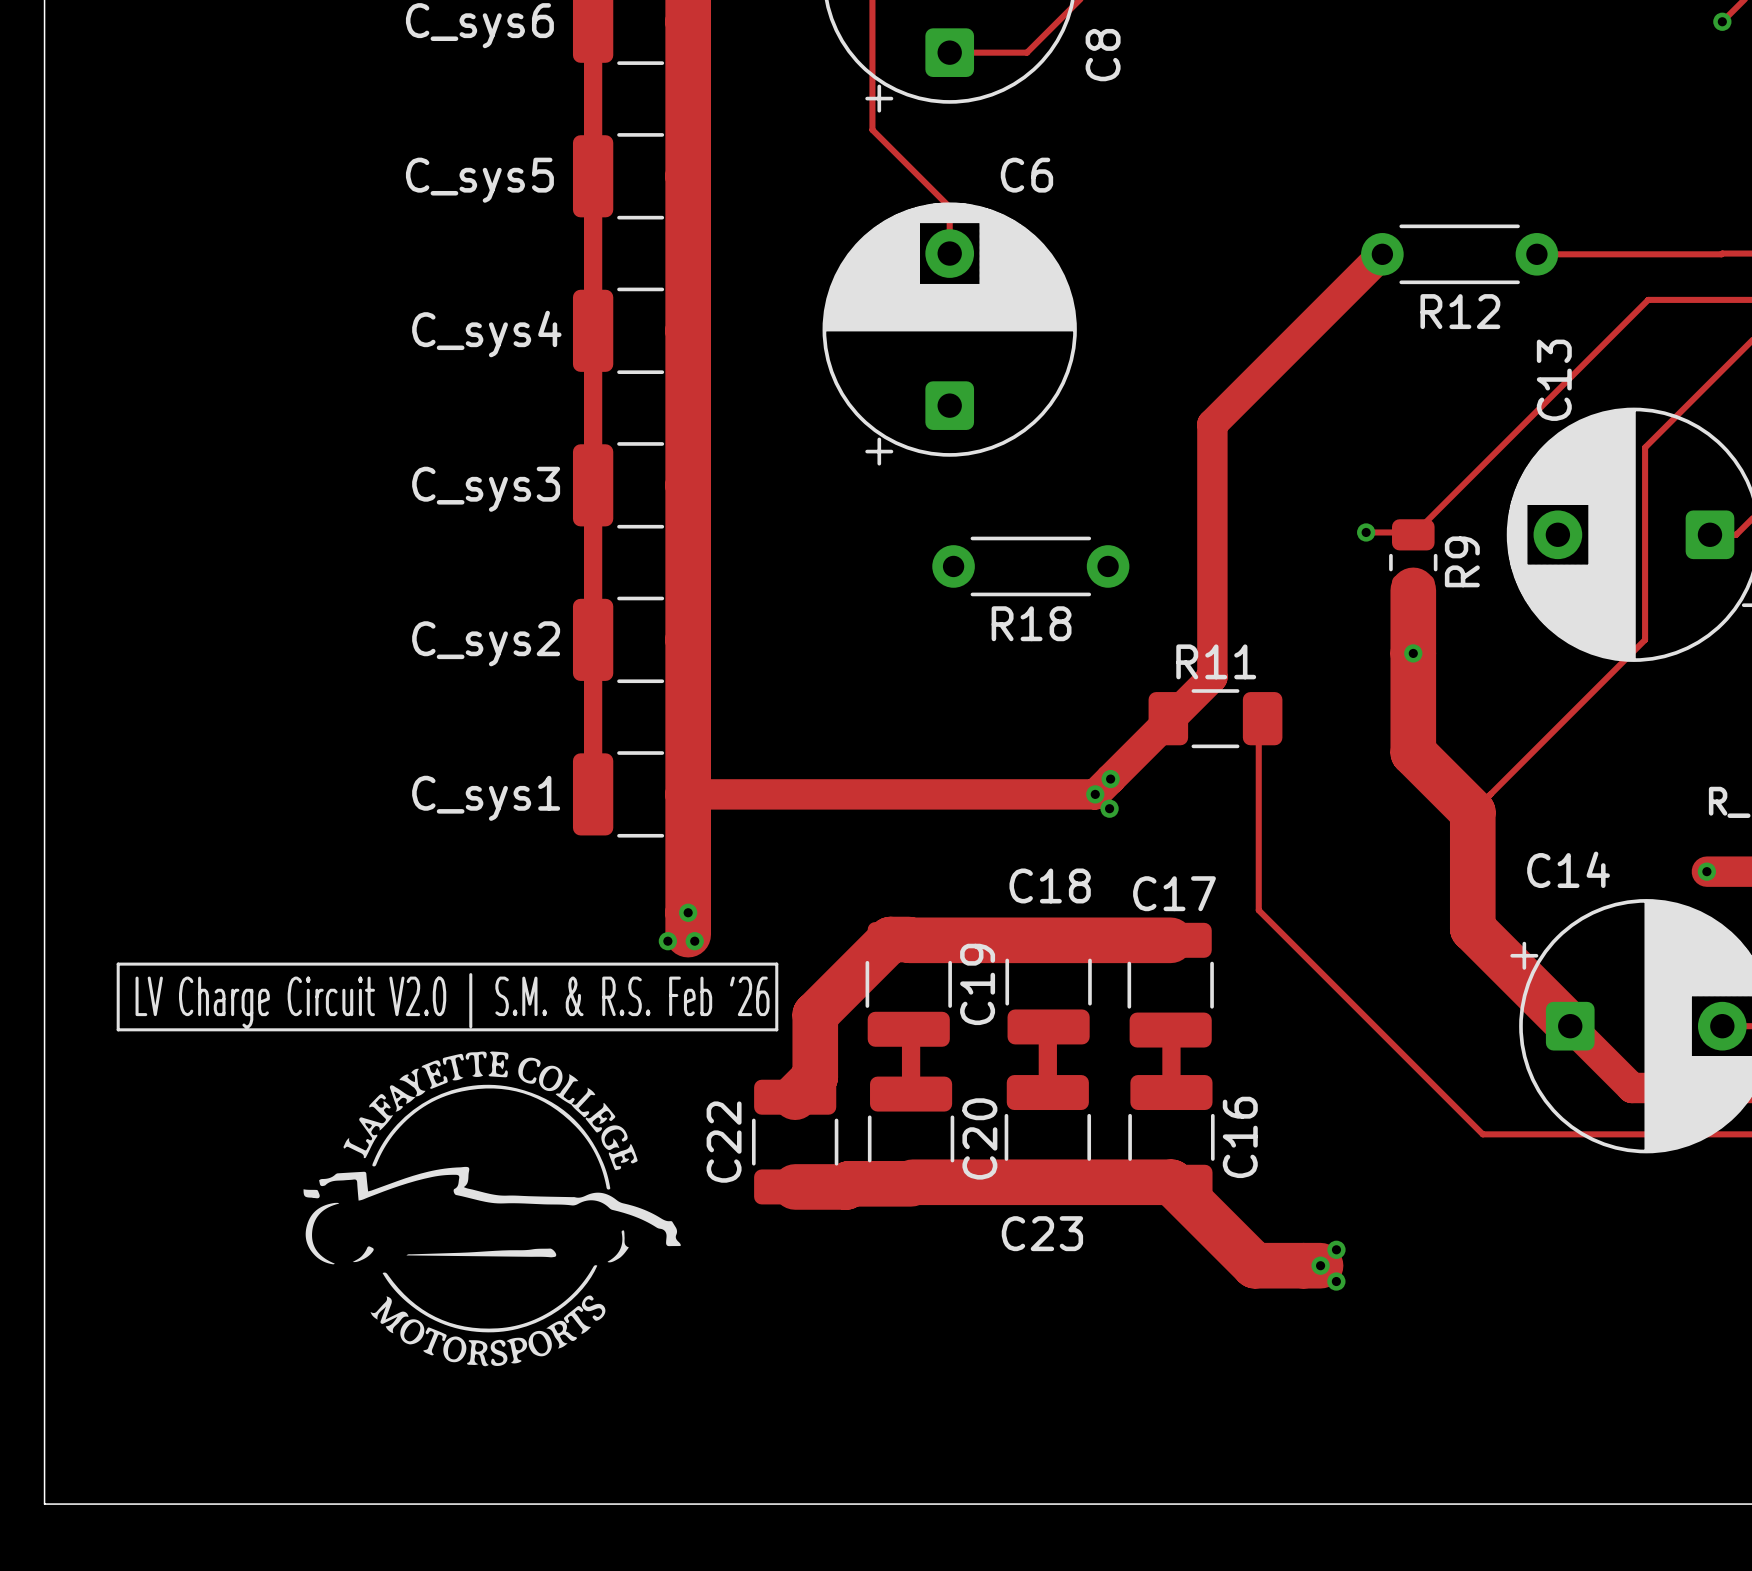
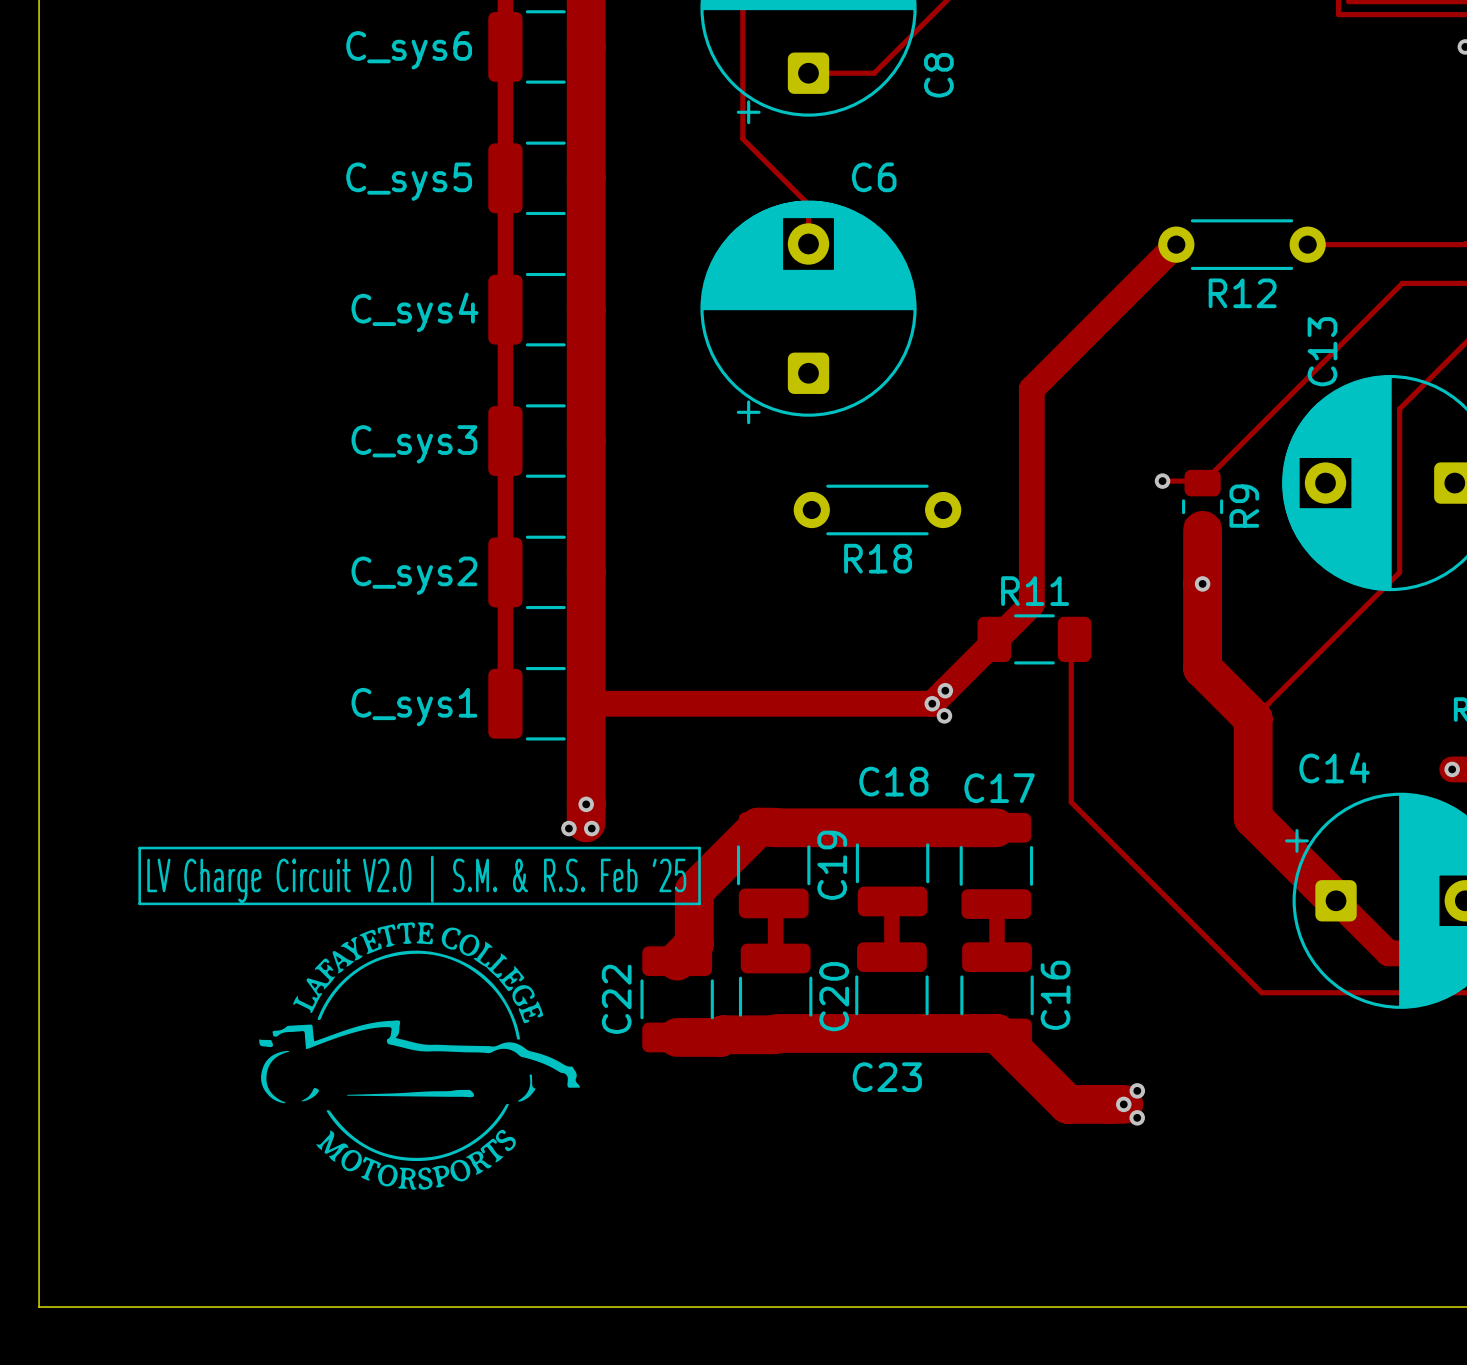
line: (162, 964) (118, 964) (118, 1029) (162, 1029) -> (139, 848) (139, 903)
line: (776, 964) (776, 1029) -> (661, 848) (699, 848) (699, 903) (661, 903)
text: LV Charge Circuit V2.0 | S.M. & R.S. Feb '26 (452, 1000) -> LV Charge Circuit V2.0 | S.M. & R.S. Feb '25 (416, 879)

